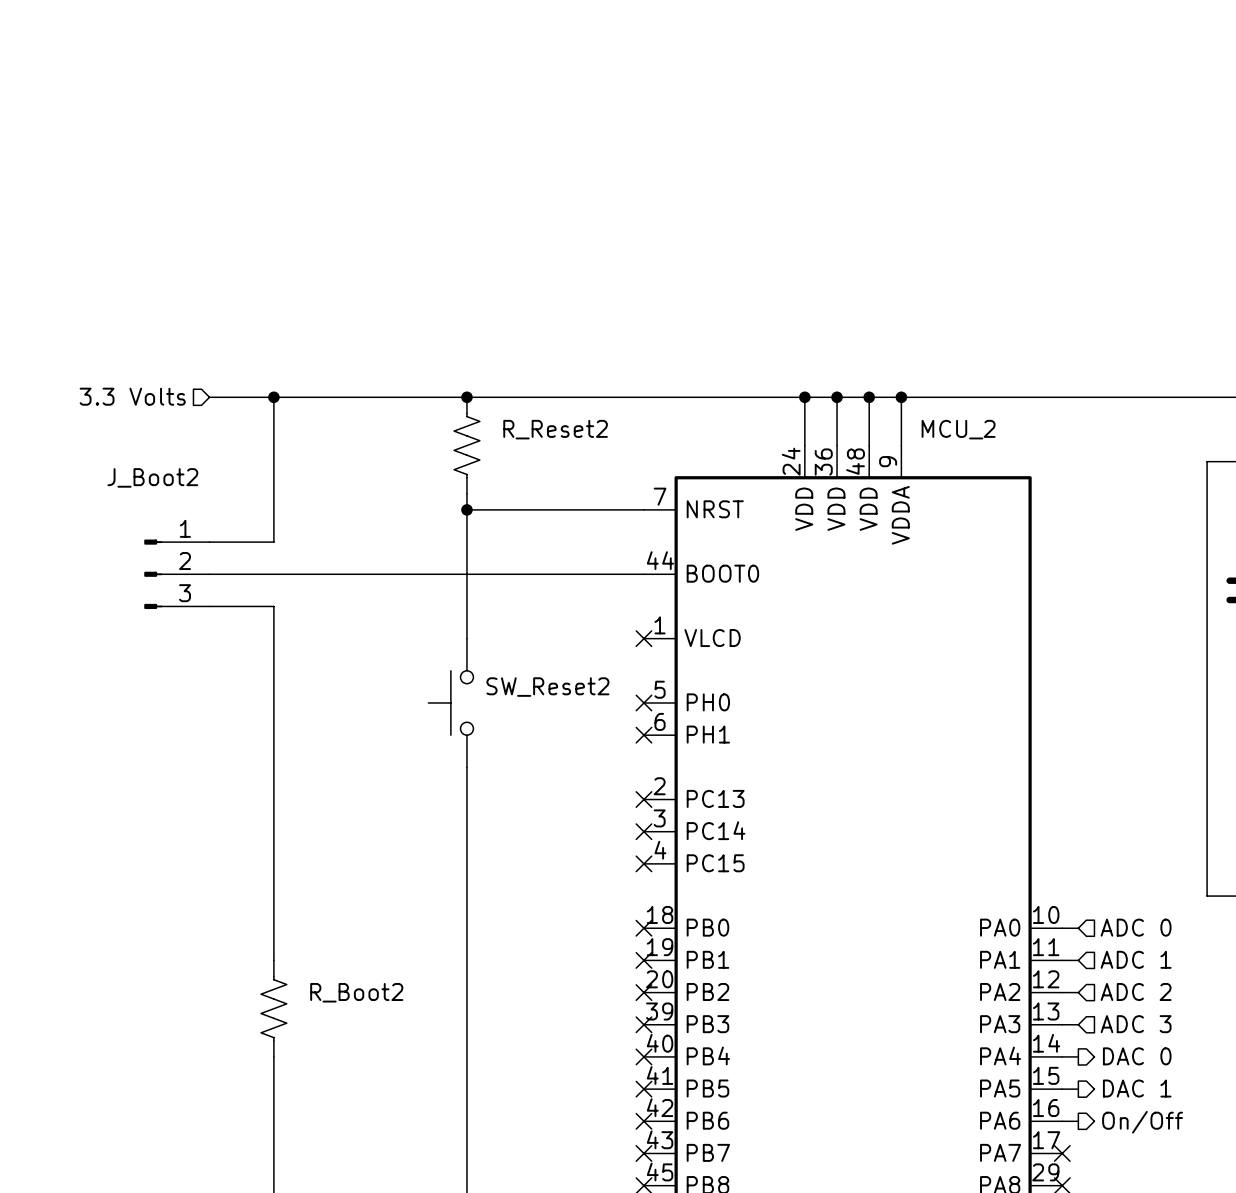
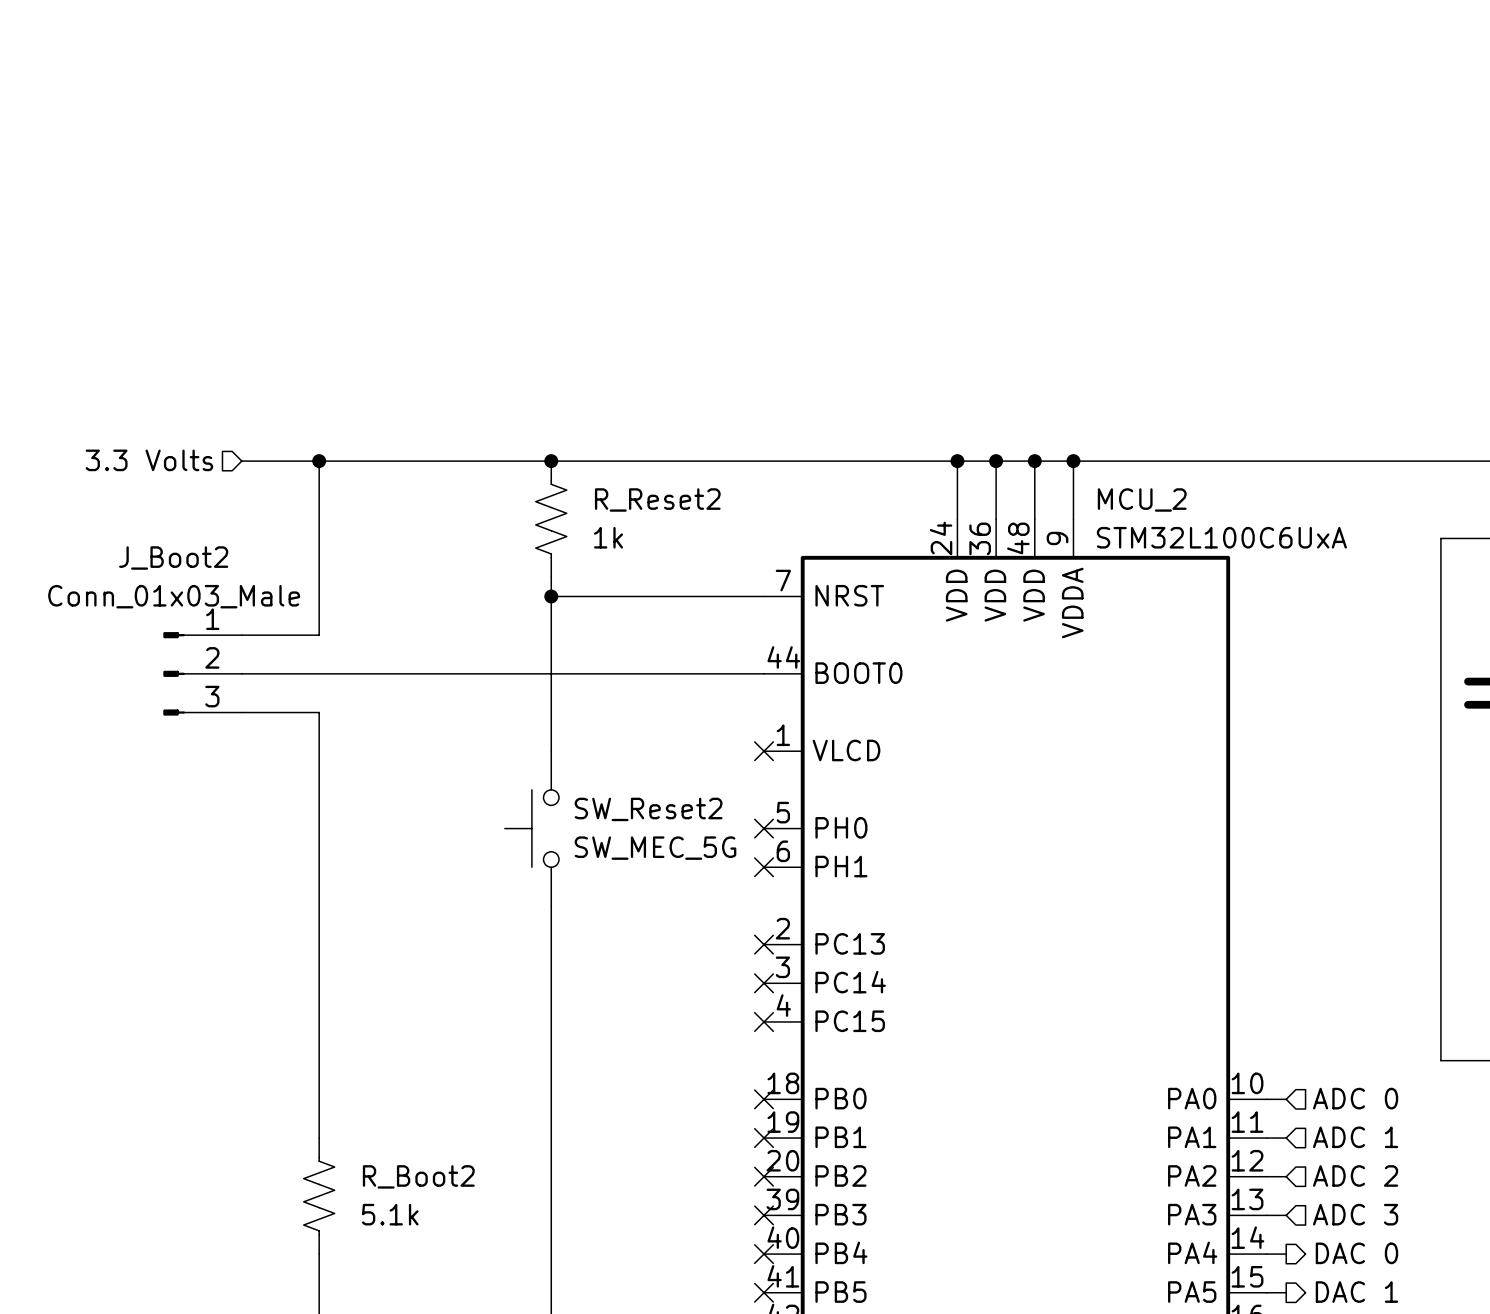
R_Reset2 value: none -> 1k (608, 537)
MCU_2 value: none -> STM32L100C6UxA (1221, 537)
J_Boot2 value: none -> Conn_01x03_Male (174, 596)
SW_Reset2 value: none -> SW_MEC_5G (655, 848)
R_Boot2 value: none -> 5.1k (390, 1214)

